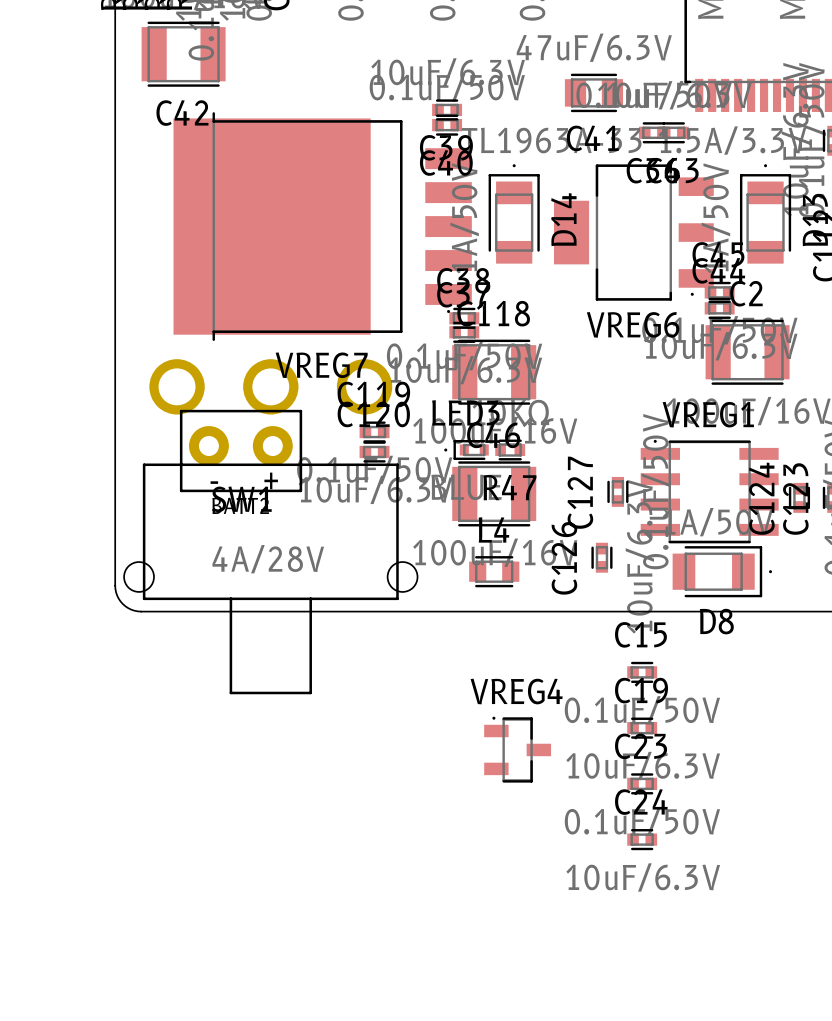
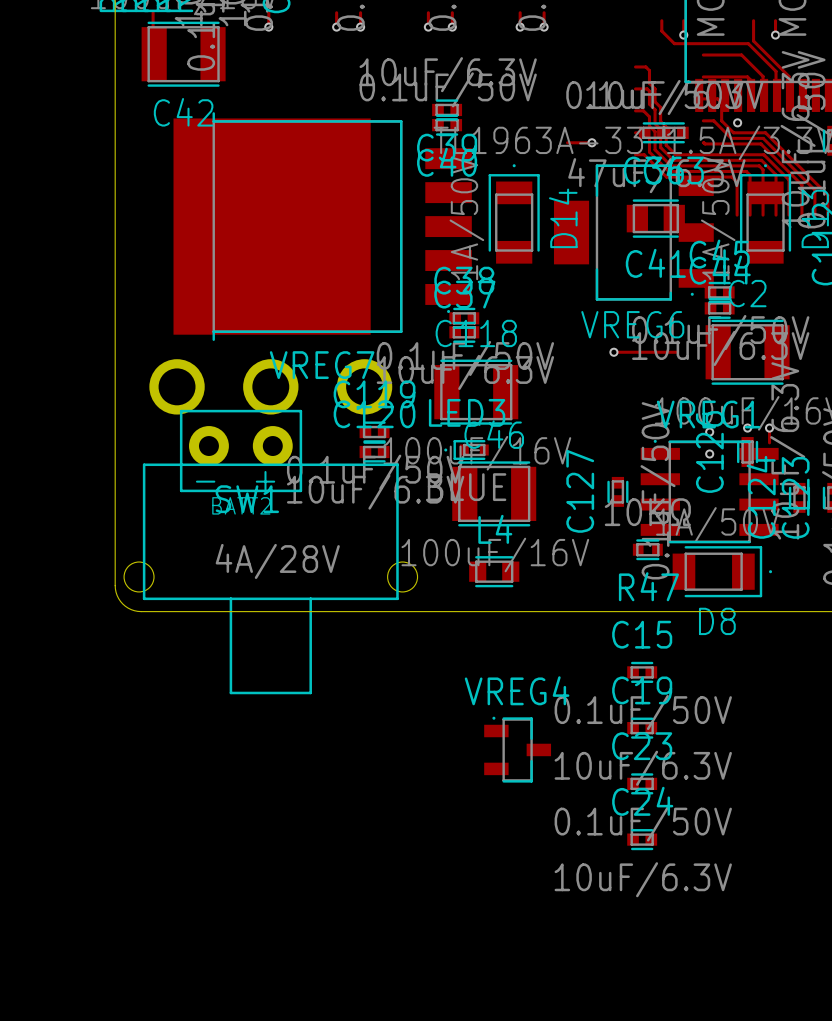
track: none -> (153, 12) (153, 27)
track: none -> (268, 12) (268, 27)
track: none -> (336, 12) (336, 27)
track: none -> (360, 12) (360, 27)
track: none -> (428, 12) (428, 27)
track: none -> (452, 12) (452, 27)
track: none -> (520, 12) (520, 27)
track: none -> (544, 12) (544, 27)
track: none -> (661, 20) (661, 31) (674, 43) (748, 43) (776, 71) (776, 98)
track: none -> (683, 20) (683, 35)
track: none -> (753, 20) (753, 41) (788, 76) (788, 98)
track: none -> (775, 20) (775, 35)
via: none -> (268, 27)
via: none -> (336, 27)
via: none -> (360, 27)
via: none -> (428, 27)
via: none -> (452, 27)
via: none -> (520, 27)
via: none -> (544, 27)
via: none -> (683, 35)
via: none -> (775, 35)
track: none -> (703, 55) (741, 55) (763, 76) (763, 98)
track: none -> (635, 66) (645, 66) (649, 70) (649, 83) (655, 88) (655, 101) (660, 107) (660, 121) (666, 127) (666, 145) (675, 154) (763, 154) (788, 179) (788, 215)
track: none -> (703, 76) (747, 76) (750, 79) (750, 98)
track: none -> (635, 88) (647, 88) (649, 91) (649, 104) (655, 109) (655, 123) (660, 129) (660, 147) (673, 160) (761, 160) (776, 174) (776, 215)
C41 position: (593, 92) -> (655, 218)
track: none -> (703, 98) (717, 98) (721, 102) (721, 120) (733, 132) (765, 132) (827, 195) (827, 215)
track: none -> (635, 110) (643, 110) (649, 116) (649, 126) (655, 131) (655, 149) (671, 165) (759, 165) (763, 169) (763, 215)
track: none -> (703, 120) (713, 120) (731, 138) (763, 138) (814, 190) (814, 215)
via: none -> (737, 122)
track: none -> (635, 132) (643, 132) (649, 138) (649, 152) (668, 171) (746, 171) (750, 175) (750, 215)
track: none -> (567, 142) (591, 142)
via: none -> (591, 142)
track: none -> (703, 142) (760, 143) (801, 184) (801, 215)
track: none -> (635, 154) (644, 154) (666, 177) (731, 177) (737, 182) (737, 215)
track: none -> (613, 352) (676, 352)
via: none -> (613, 352)
C118 position: (494, 372) -> (476, 392)
via: none -> (747, 428)
track: none -> (769, 428) (769, 442)
via: none -> (769, 428)
via: none -> (709, 432)
R47 position: (510, 450) -> (647, 549)
via: none -> (709, 453)
C126 position: (601, 557) -> (747, 452)

